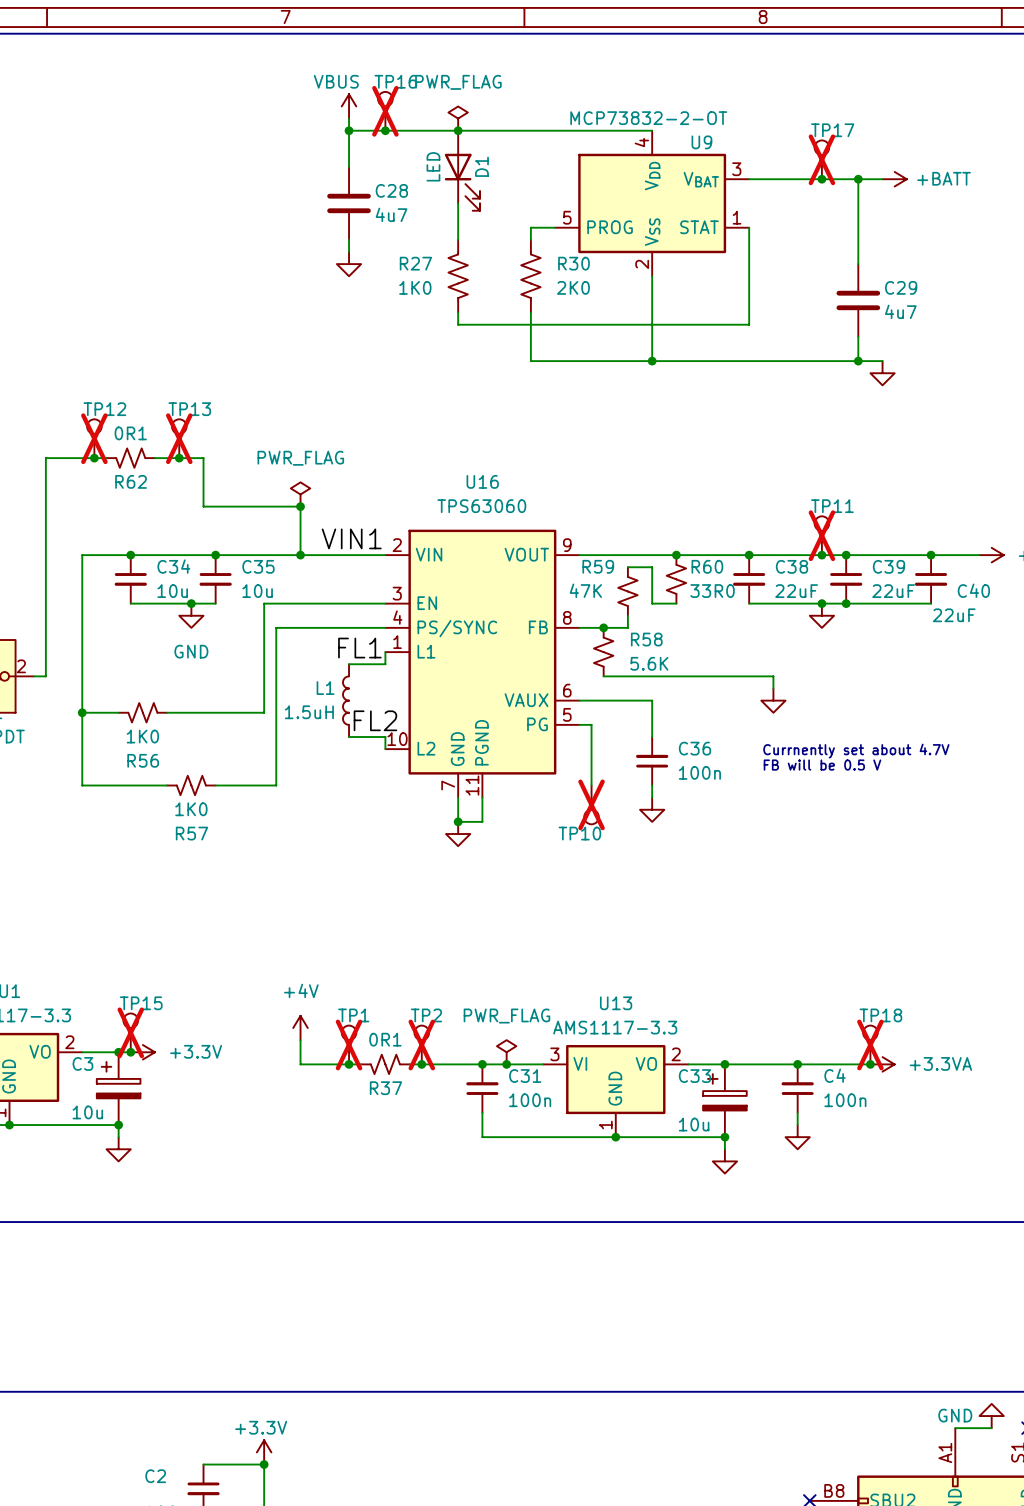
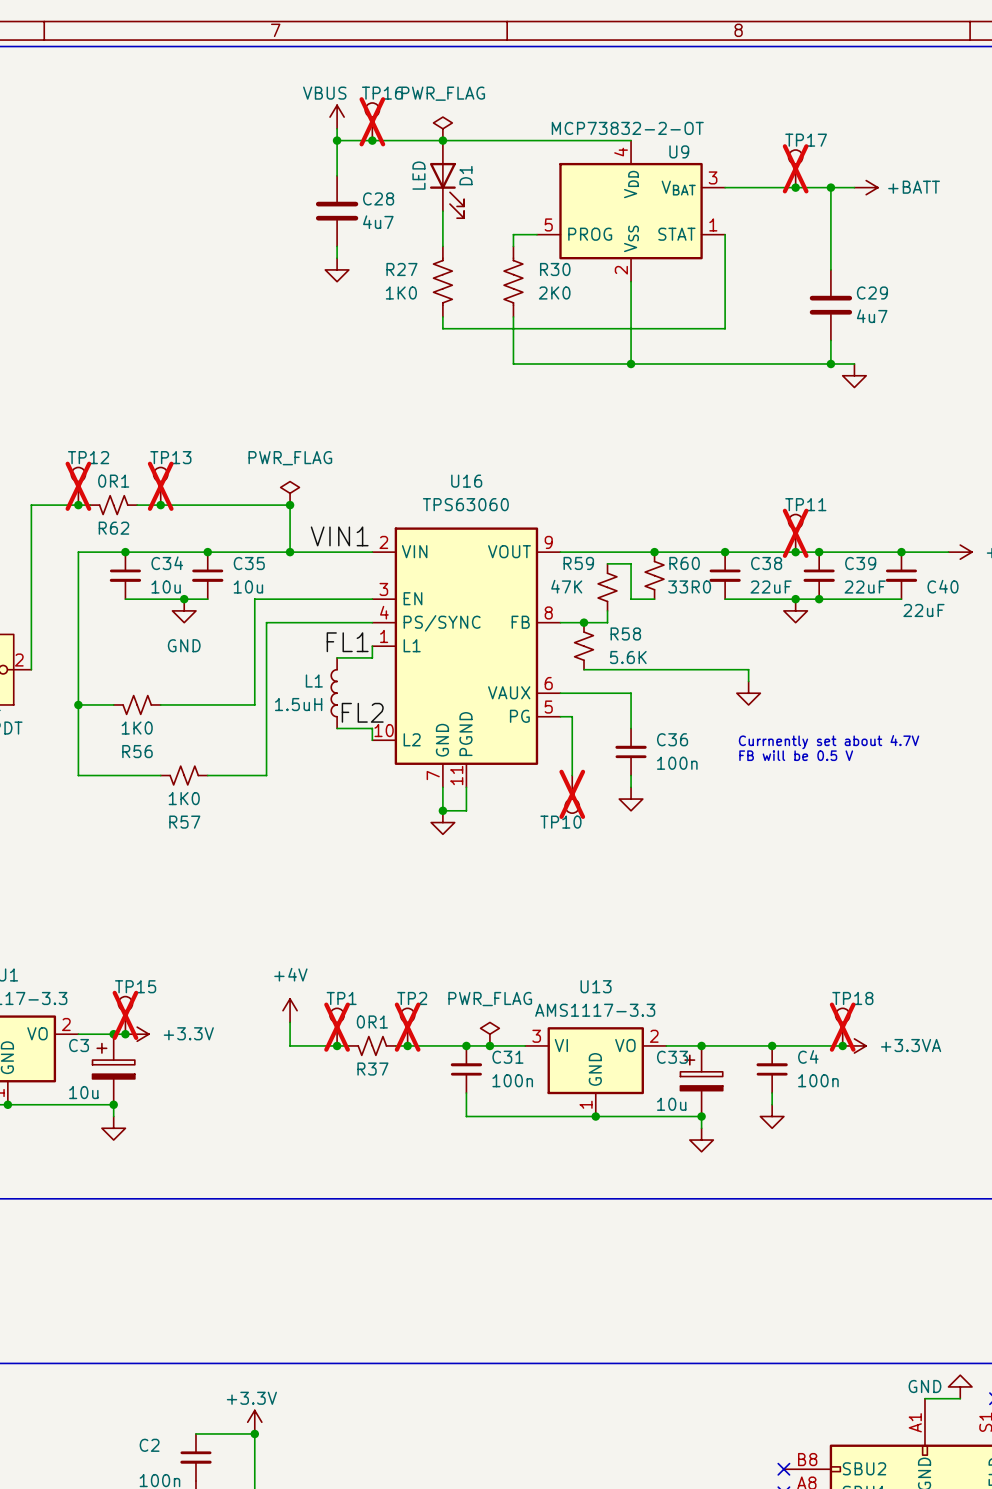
TP12 position: (94, 438) -> (78, 486)
TP13 position: (179, 438) -> (160, 486)
junction: (94, 458) -> none
wire: (106, 458) (45, 458) (45, 676) (33, 676) -> (90, 505) (31, 505) (31, 669)
R62 position: (130, 458) -> (113, 505)
wire: (155, 458) (203, 458) (203, 506) -> (137, 505) (195, 505)
junction: (179, 458) -> none
junction: none -> (78, 505)
junction: none -> (160, 505)

